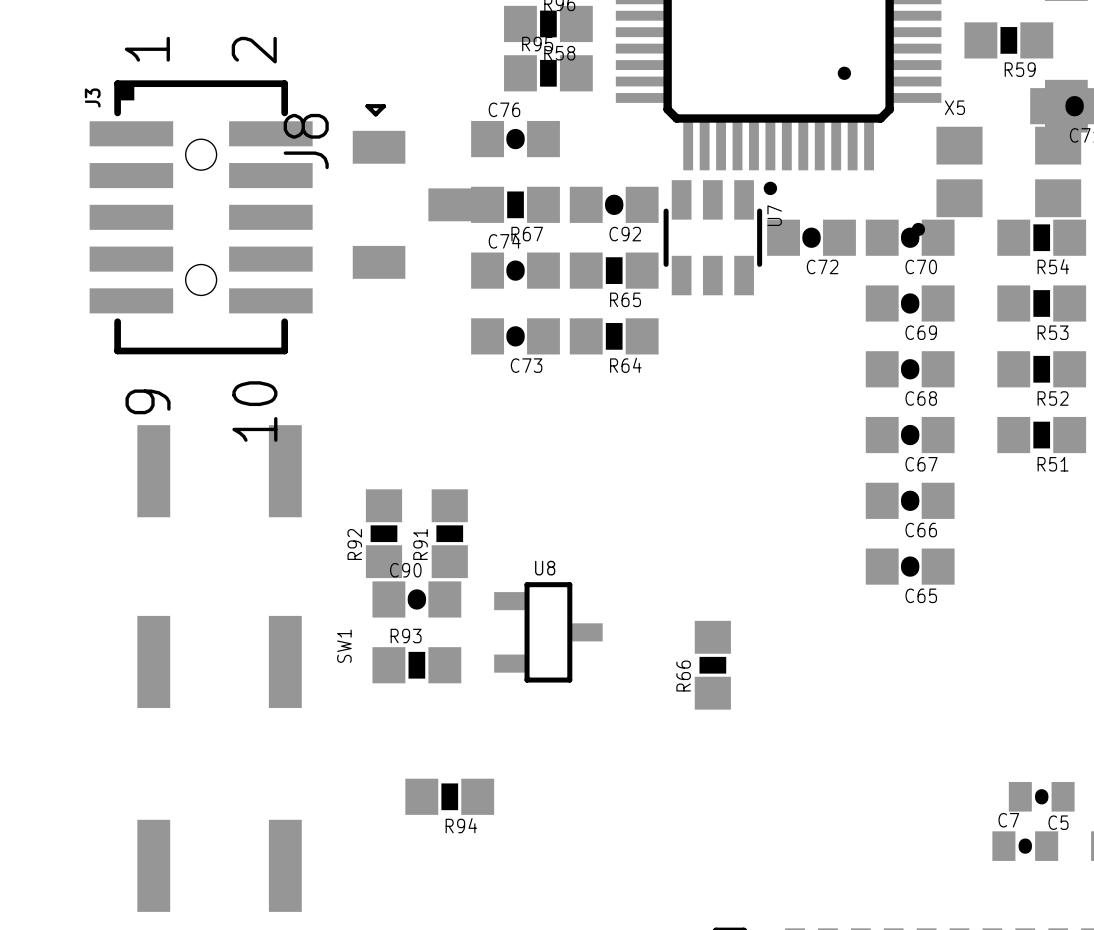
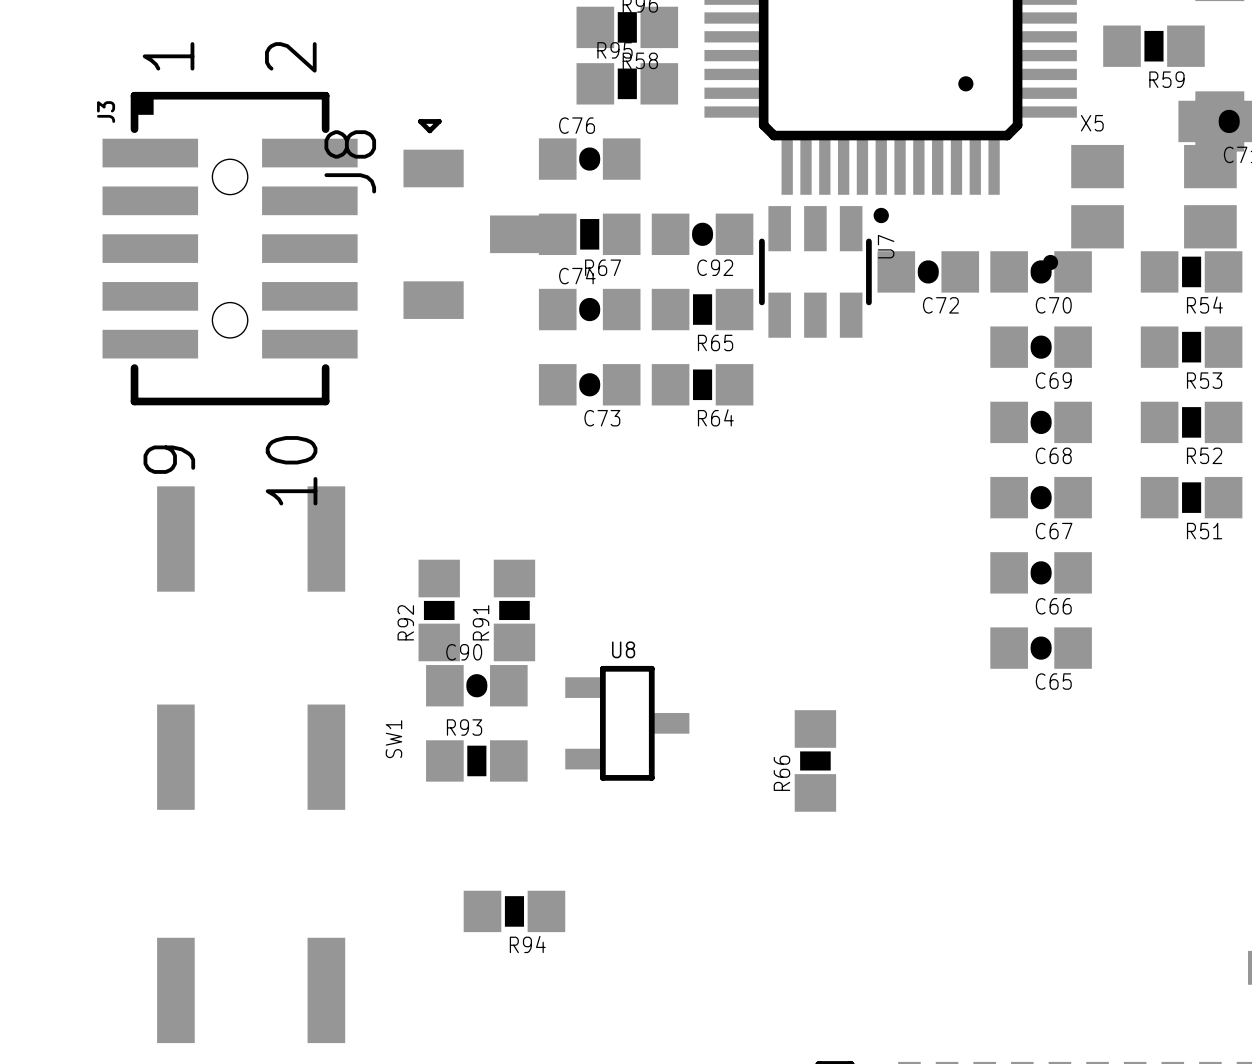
C5: (1041, 796) -> none
C7: (1025, 846) -> none

